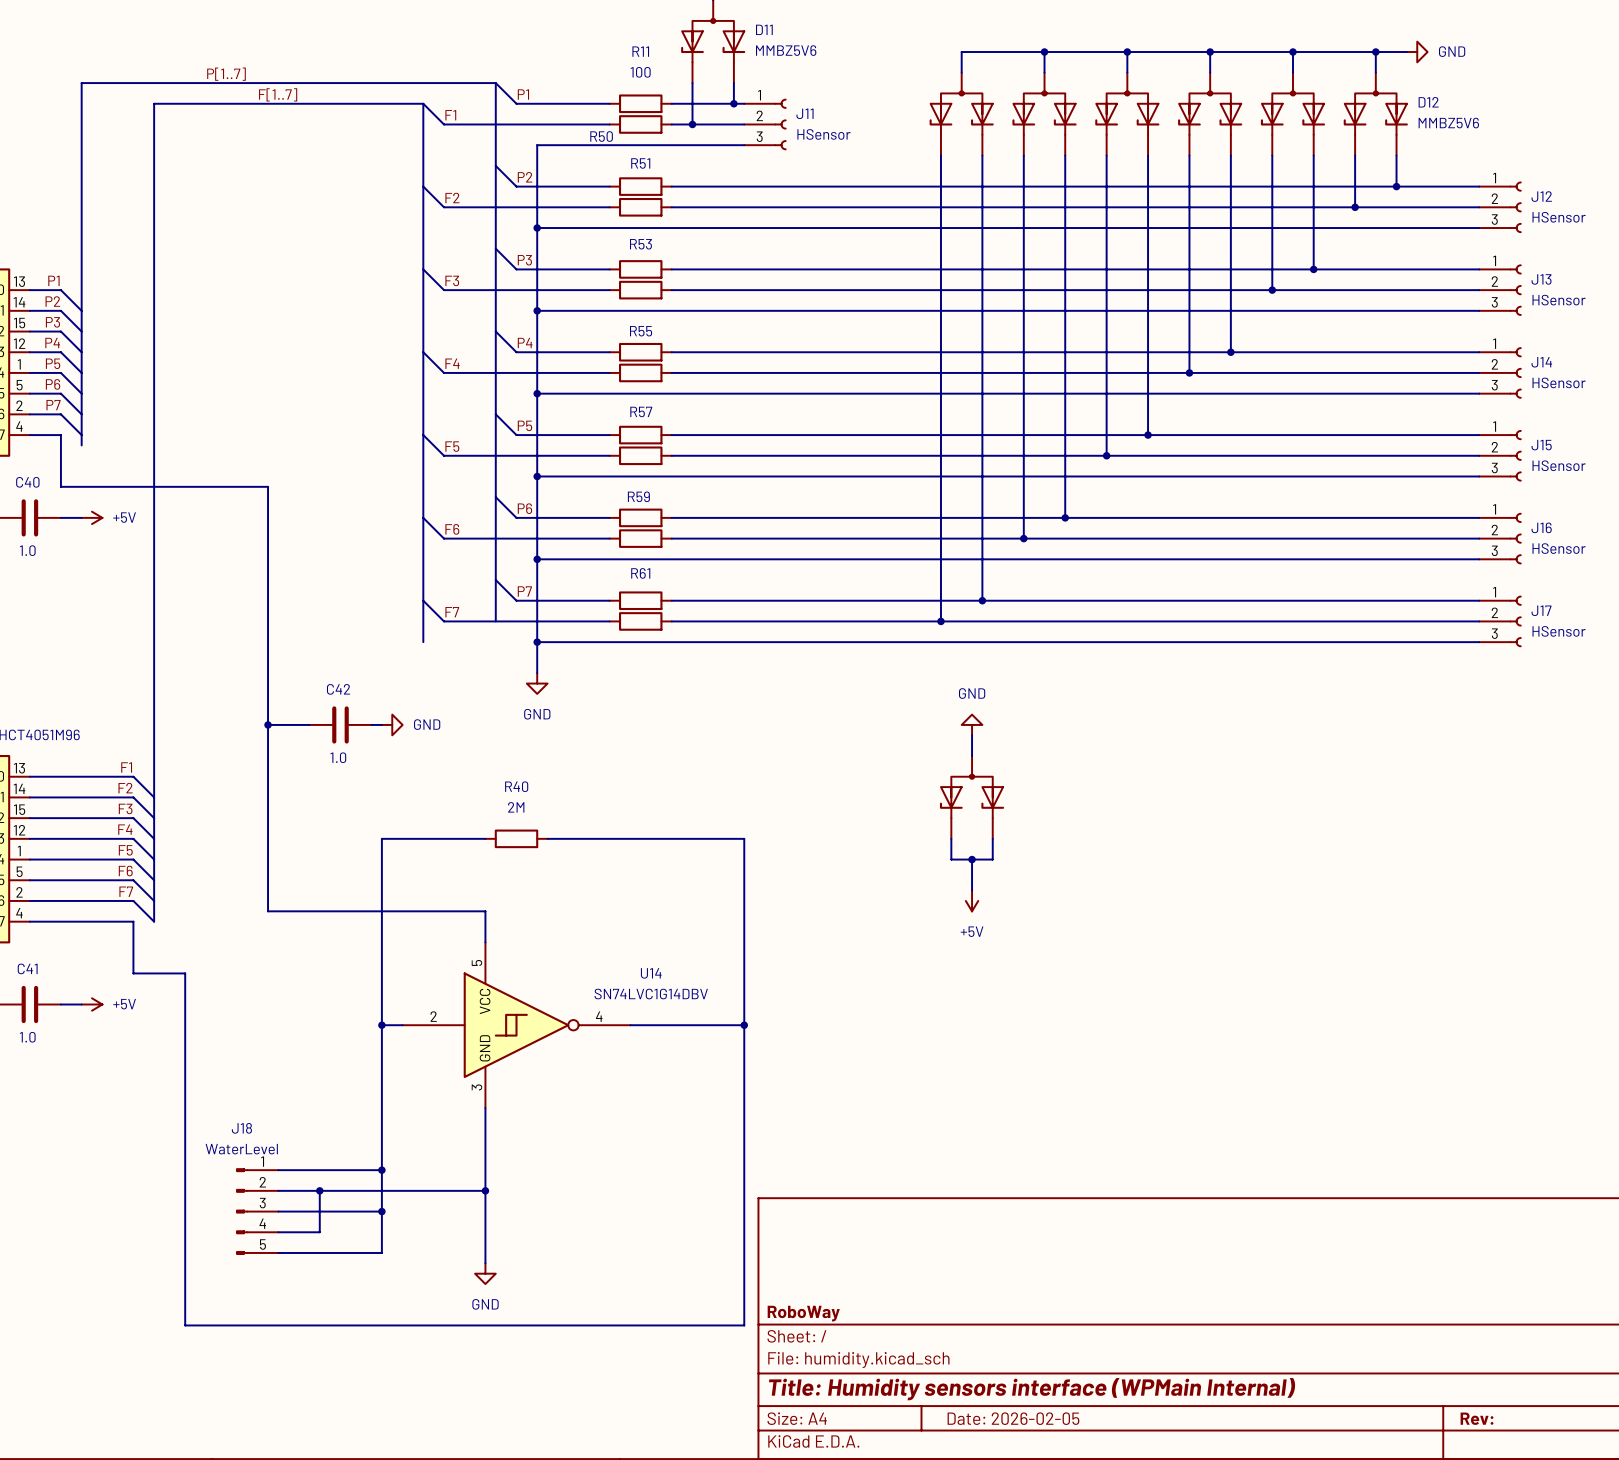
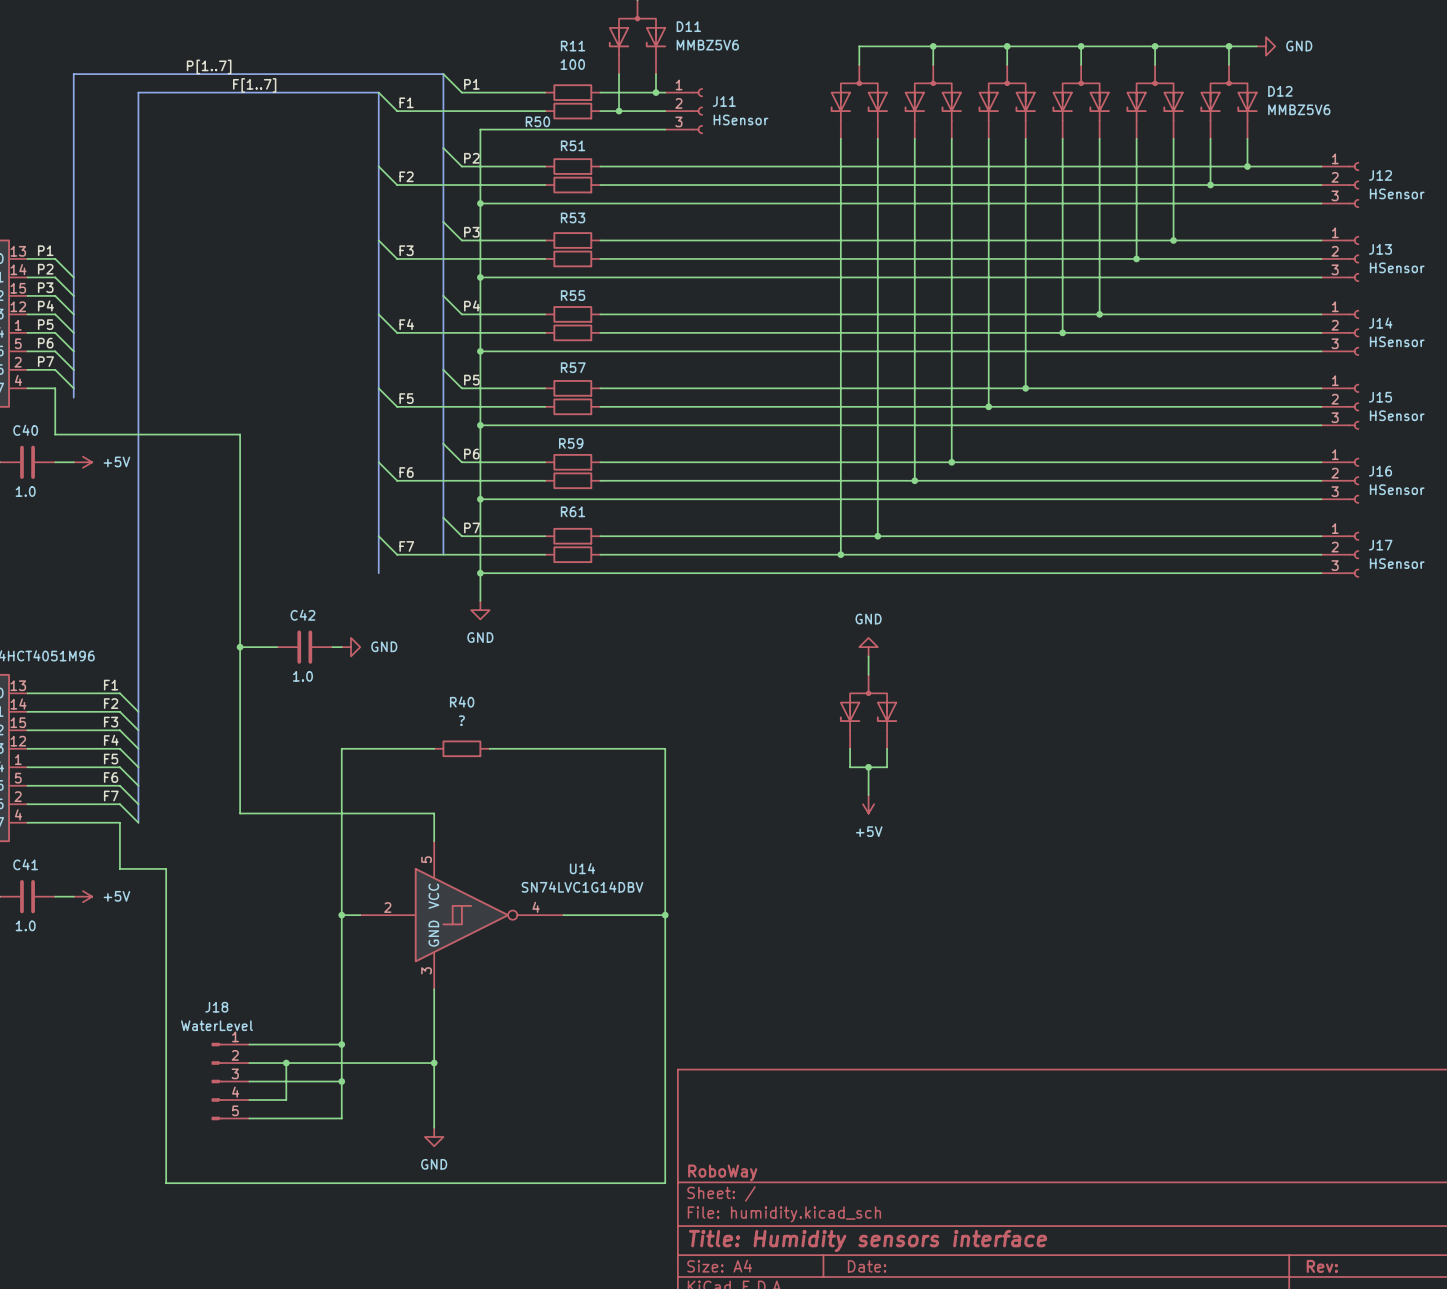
R40 value: 2M (516, 807) -> ? (461, 720)
title block: Title: Humidity sensors interface (WPMain Internal) (1032, 1389) -> Title: Humidity sensors interface (867, 1241)
title block: Date: 2026-02-05 (1013, 1418) -> Date: (867, 1266)

